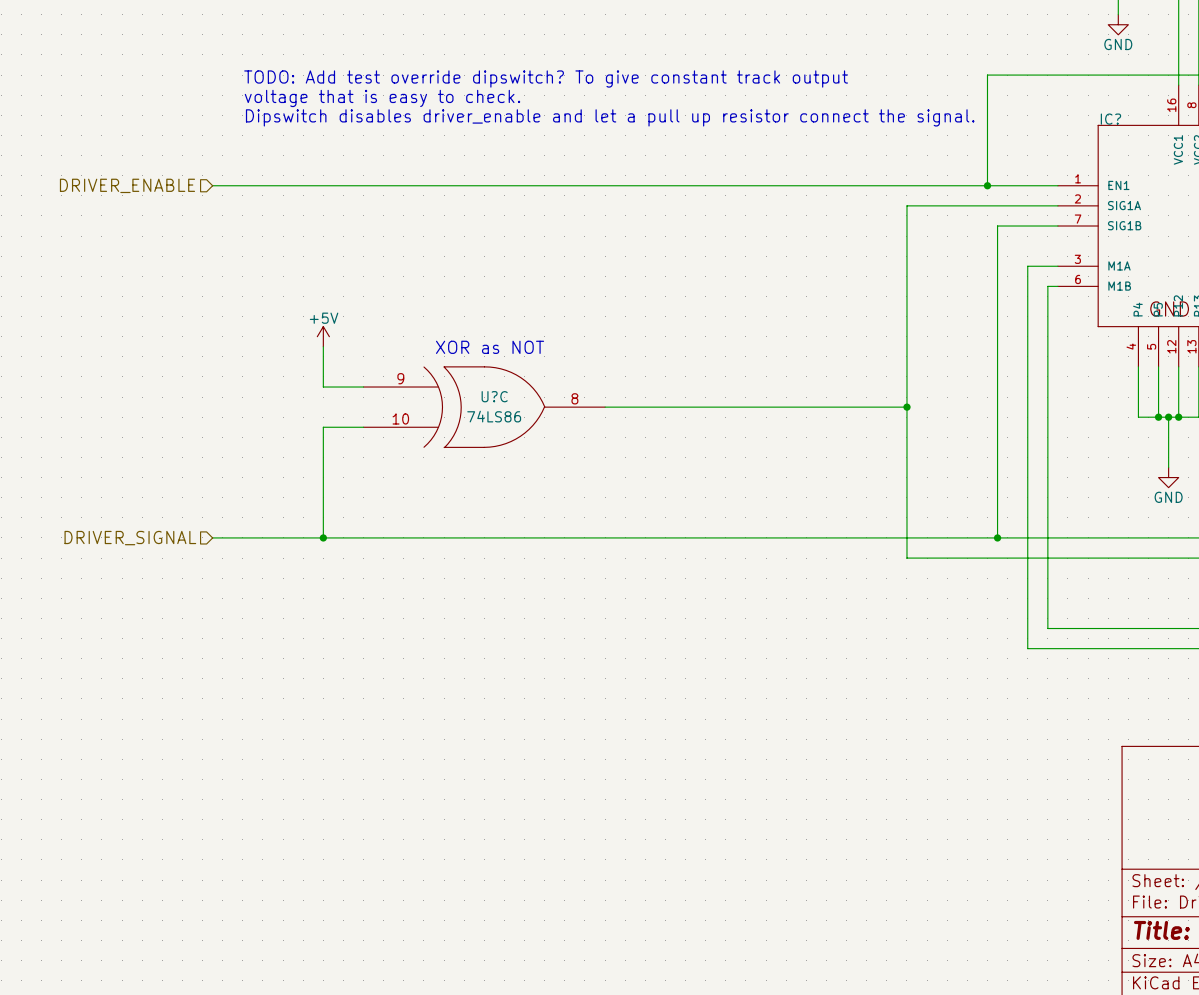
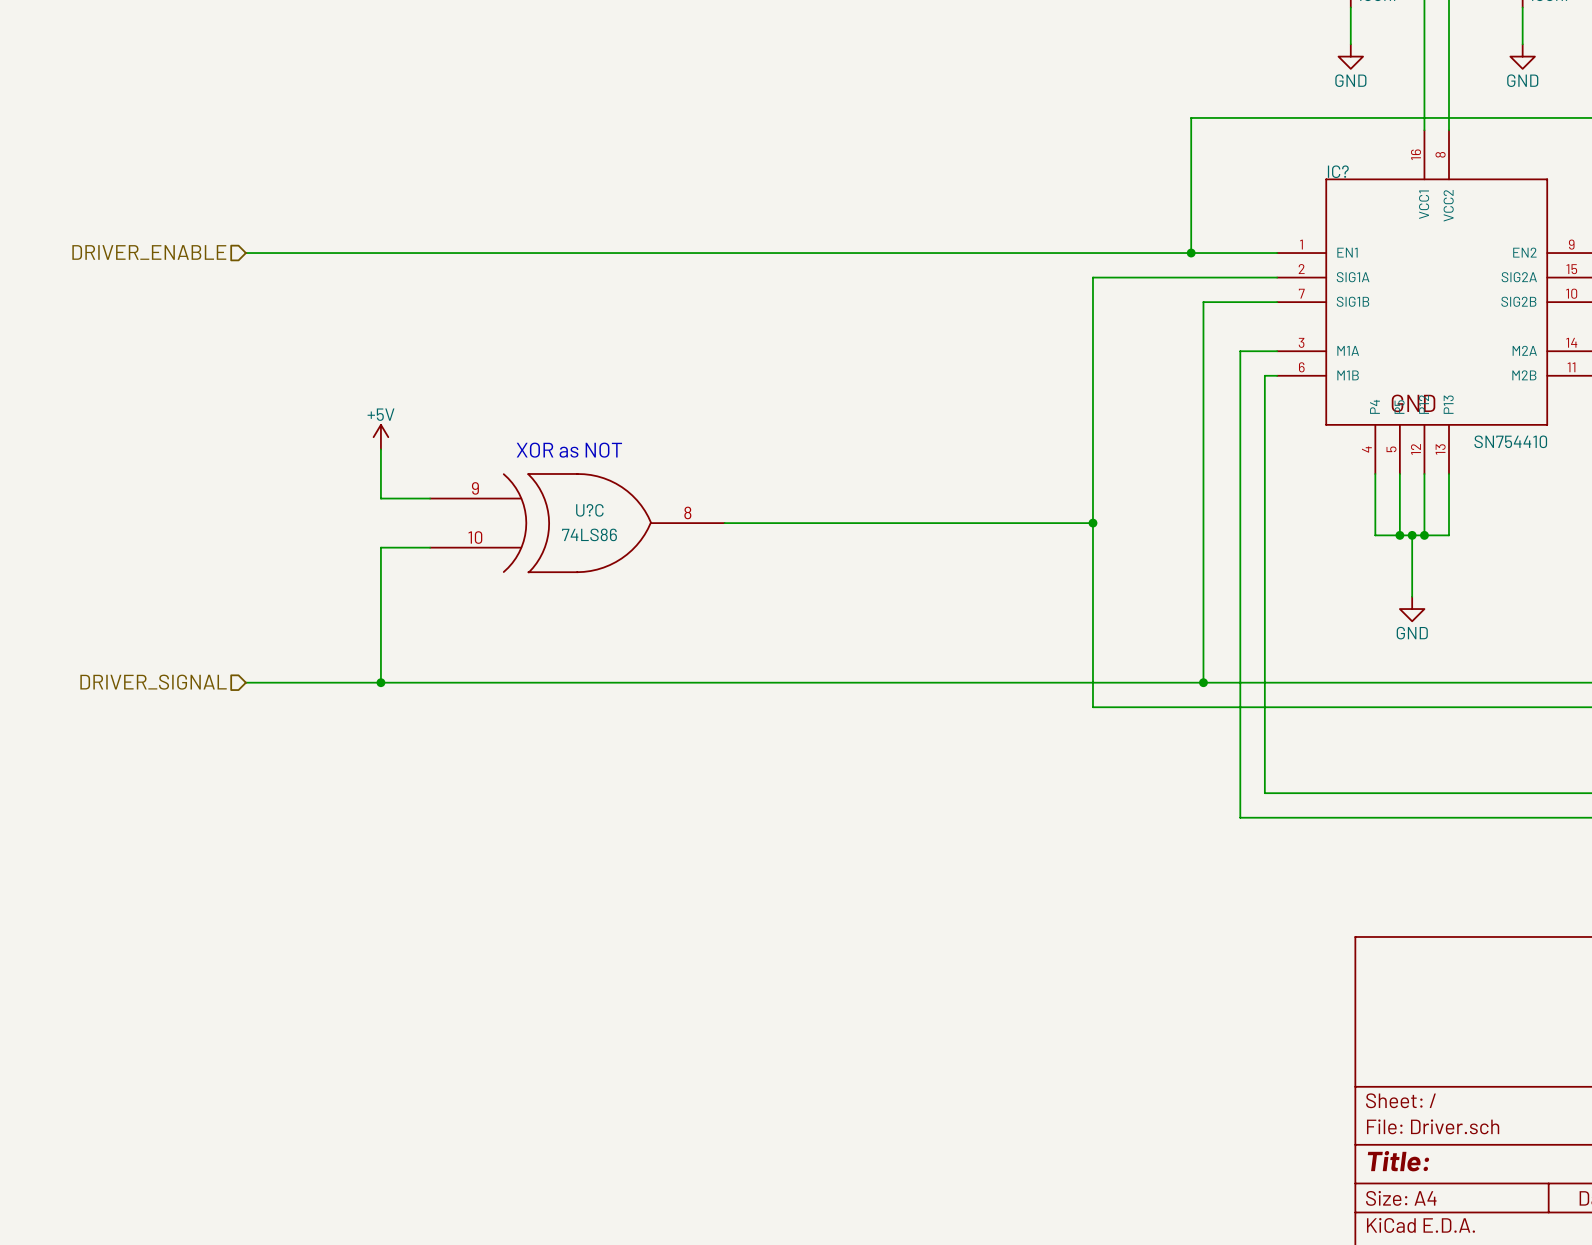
text: TODO: Add test override dipswitch? To give constant track output (546, 79) -> none
text: voltage that is easy to check. (382, 98) -> none
text: Dipswitch disables driver_enable and let a pull up resistor connect the signal. (610, 117) -> none

